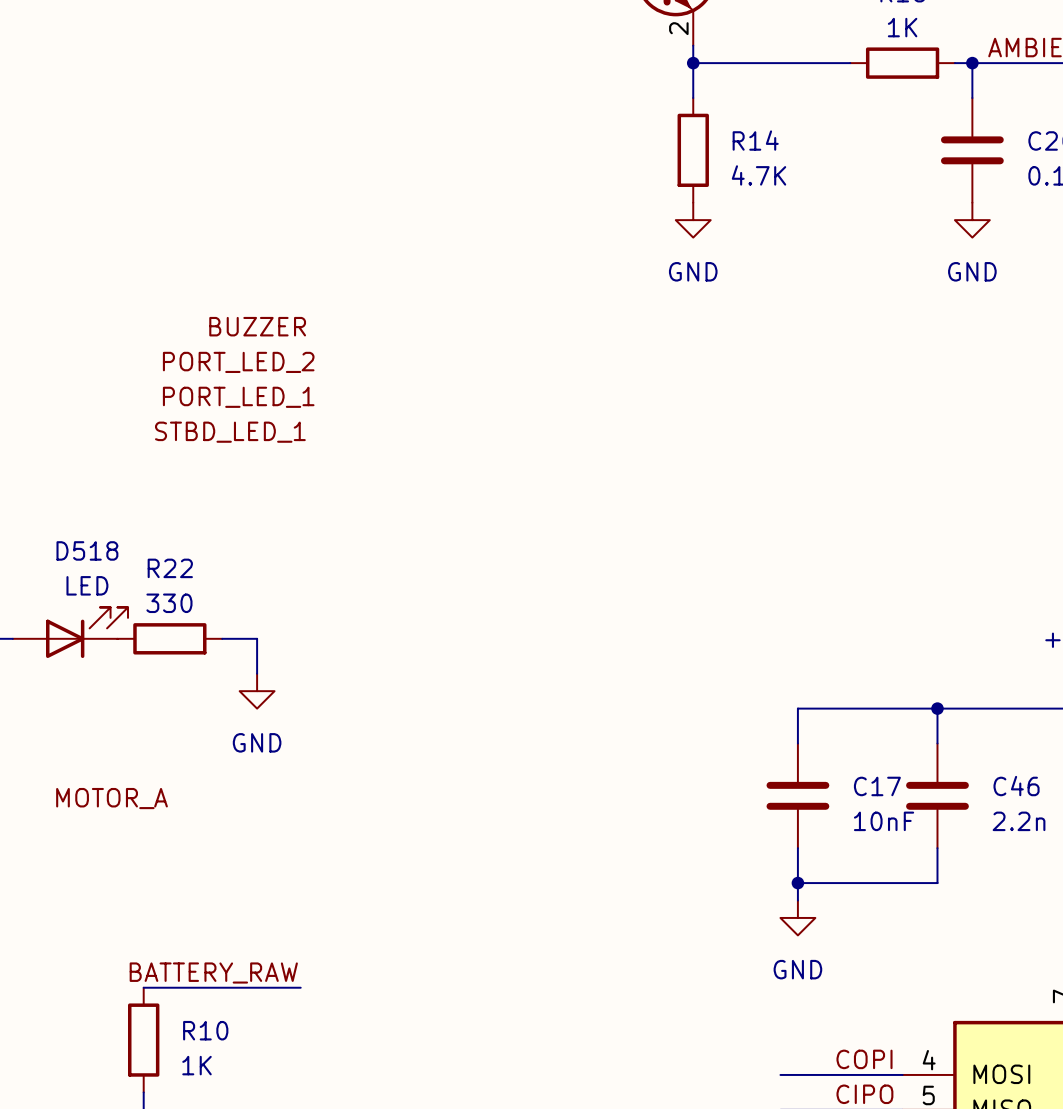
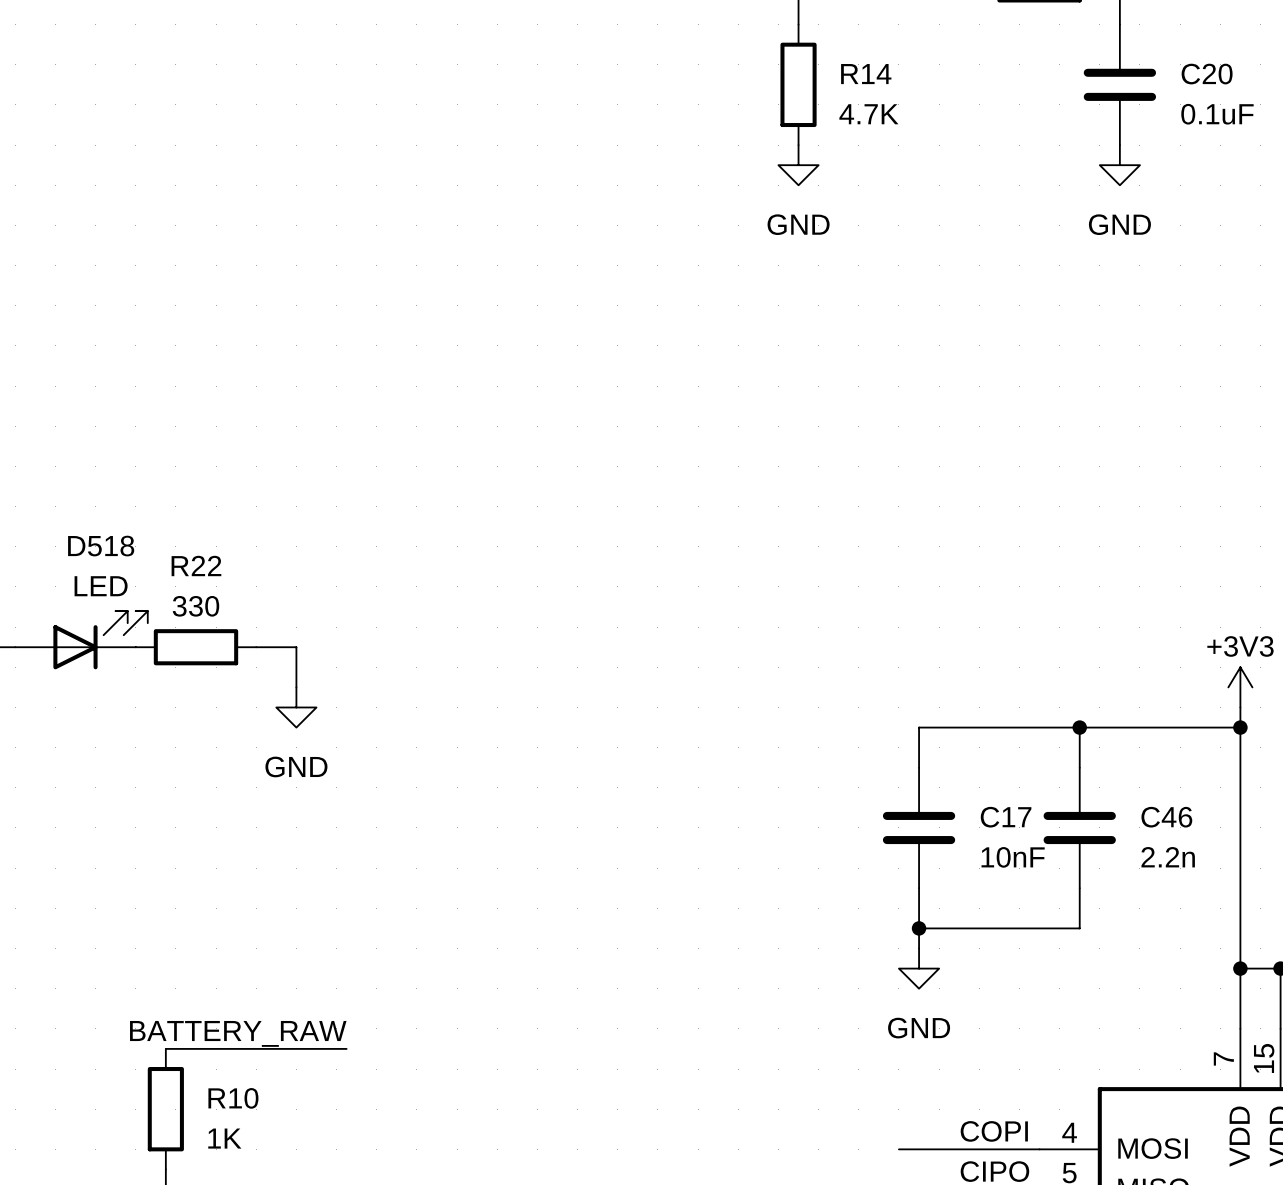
label: BUZZER (257, 326) -> none
label: PORT_LED_2 (238, 362) -> none
label: PORT_LED_1 (238, 397) -> none
label: STBD_LED_1 (230, 432) -> none
label: MOTOR_A (112, 798) -> none

